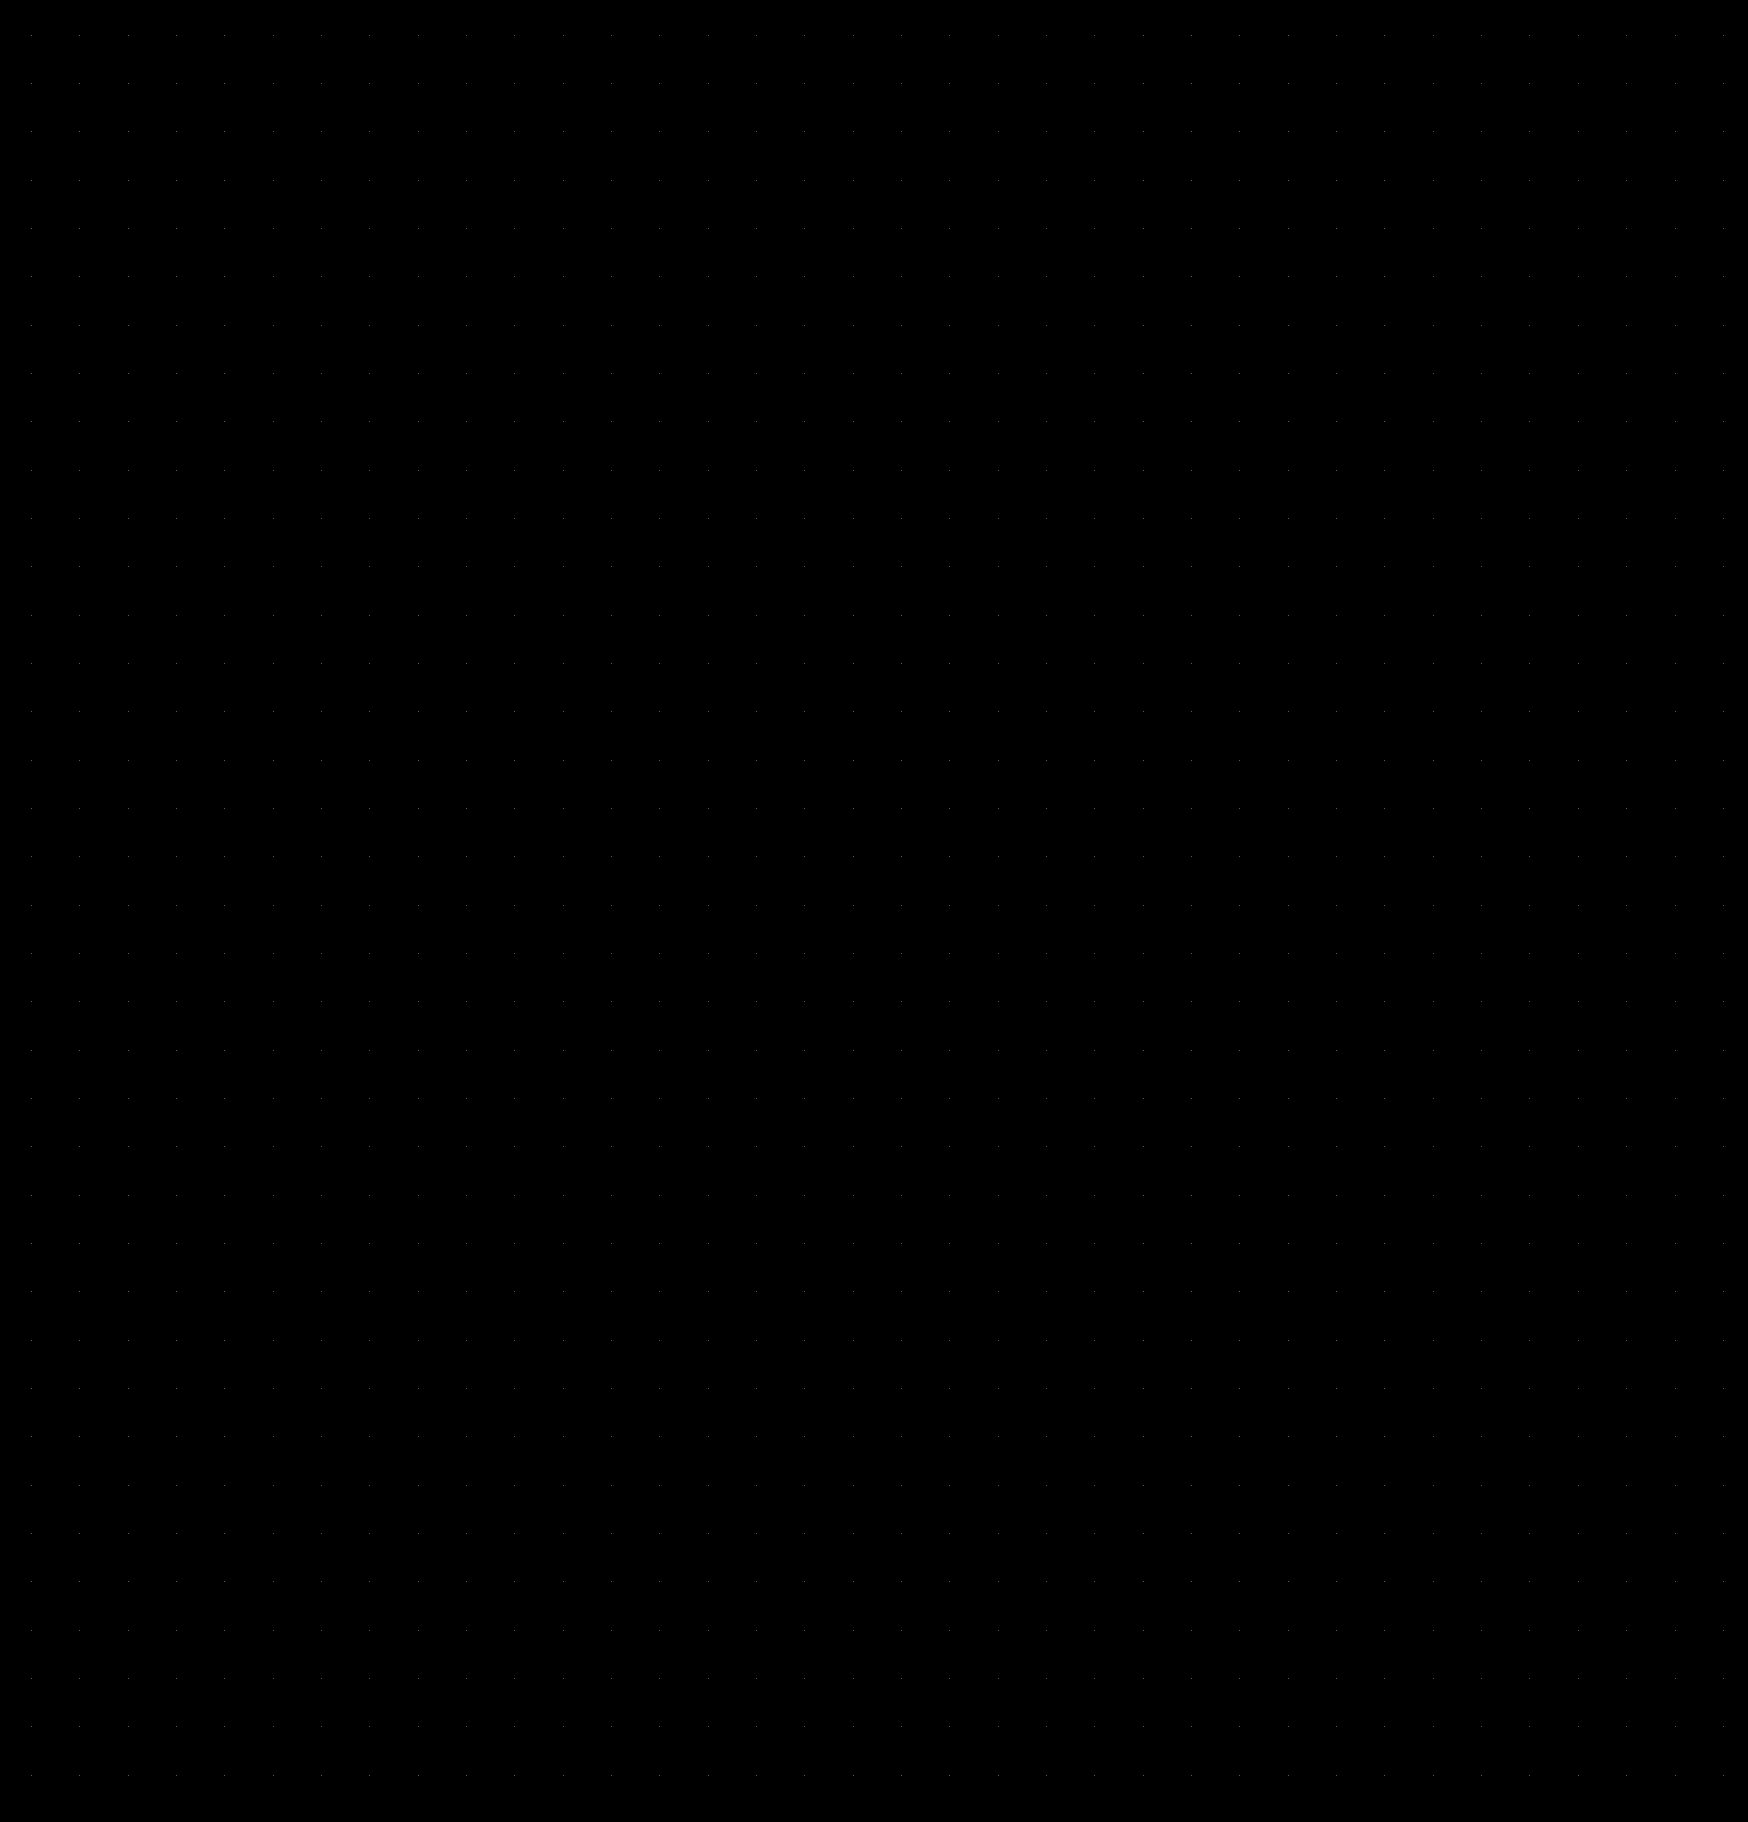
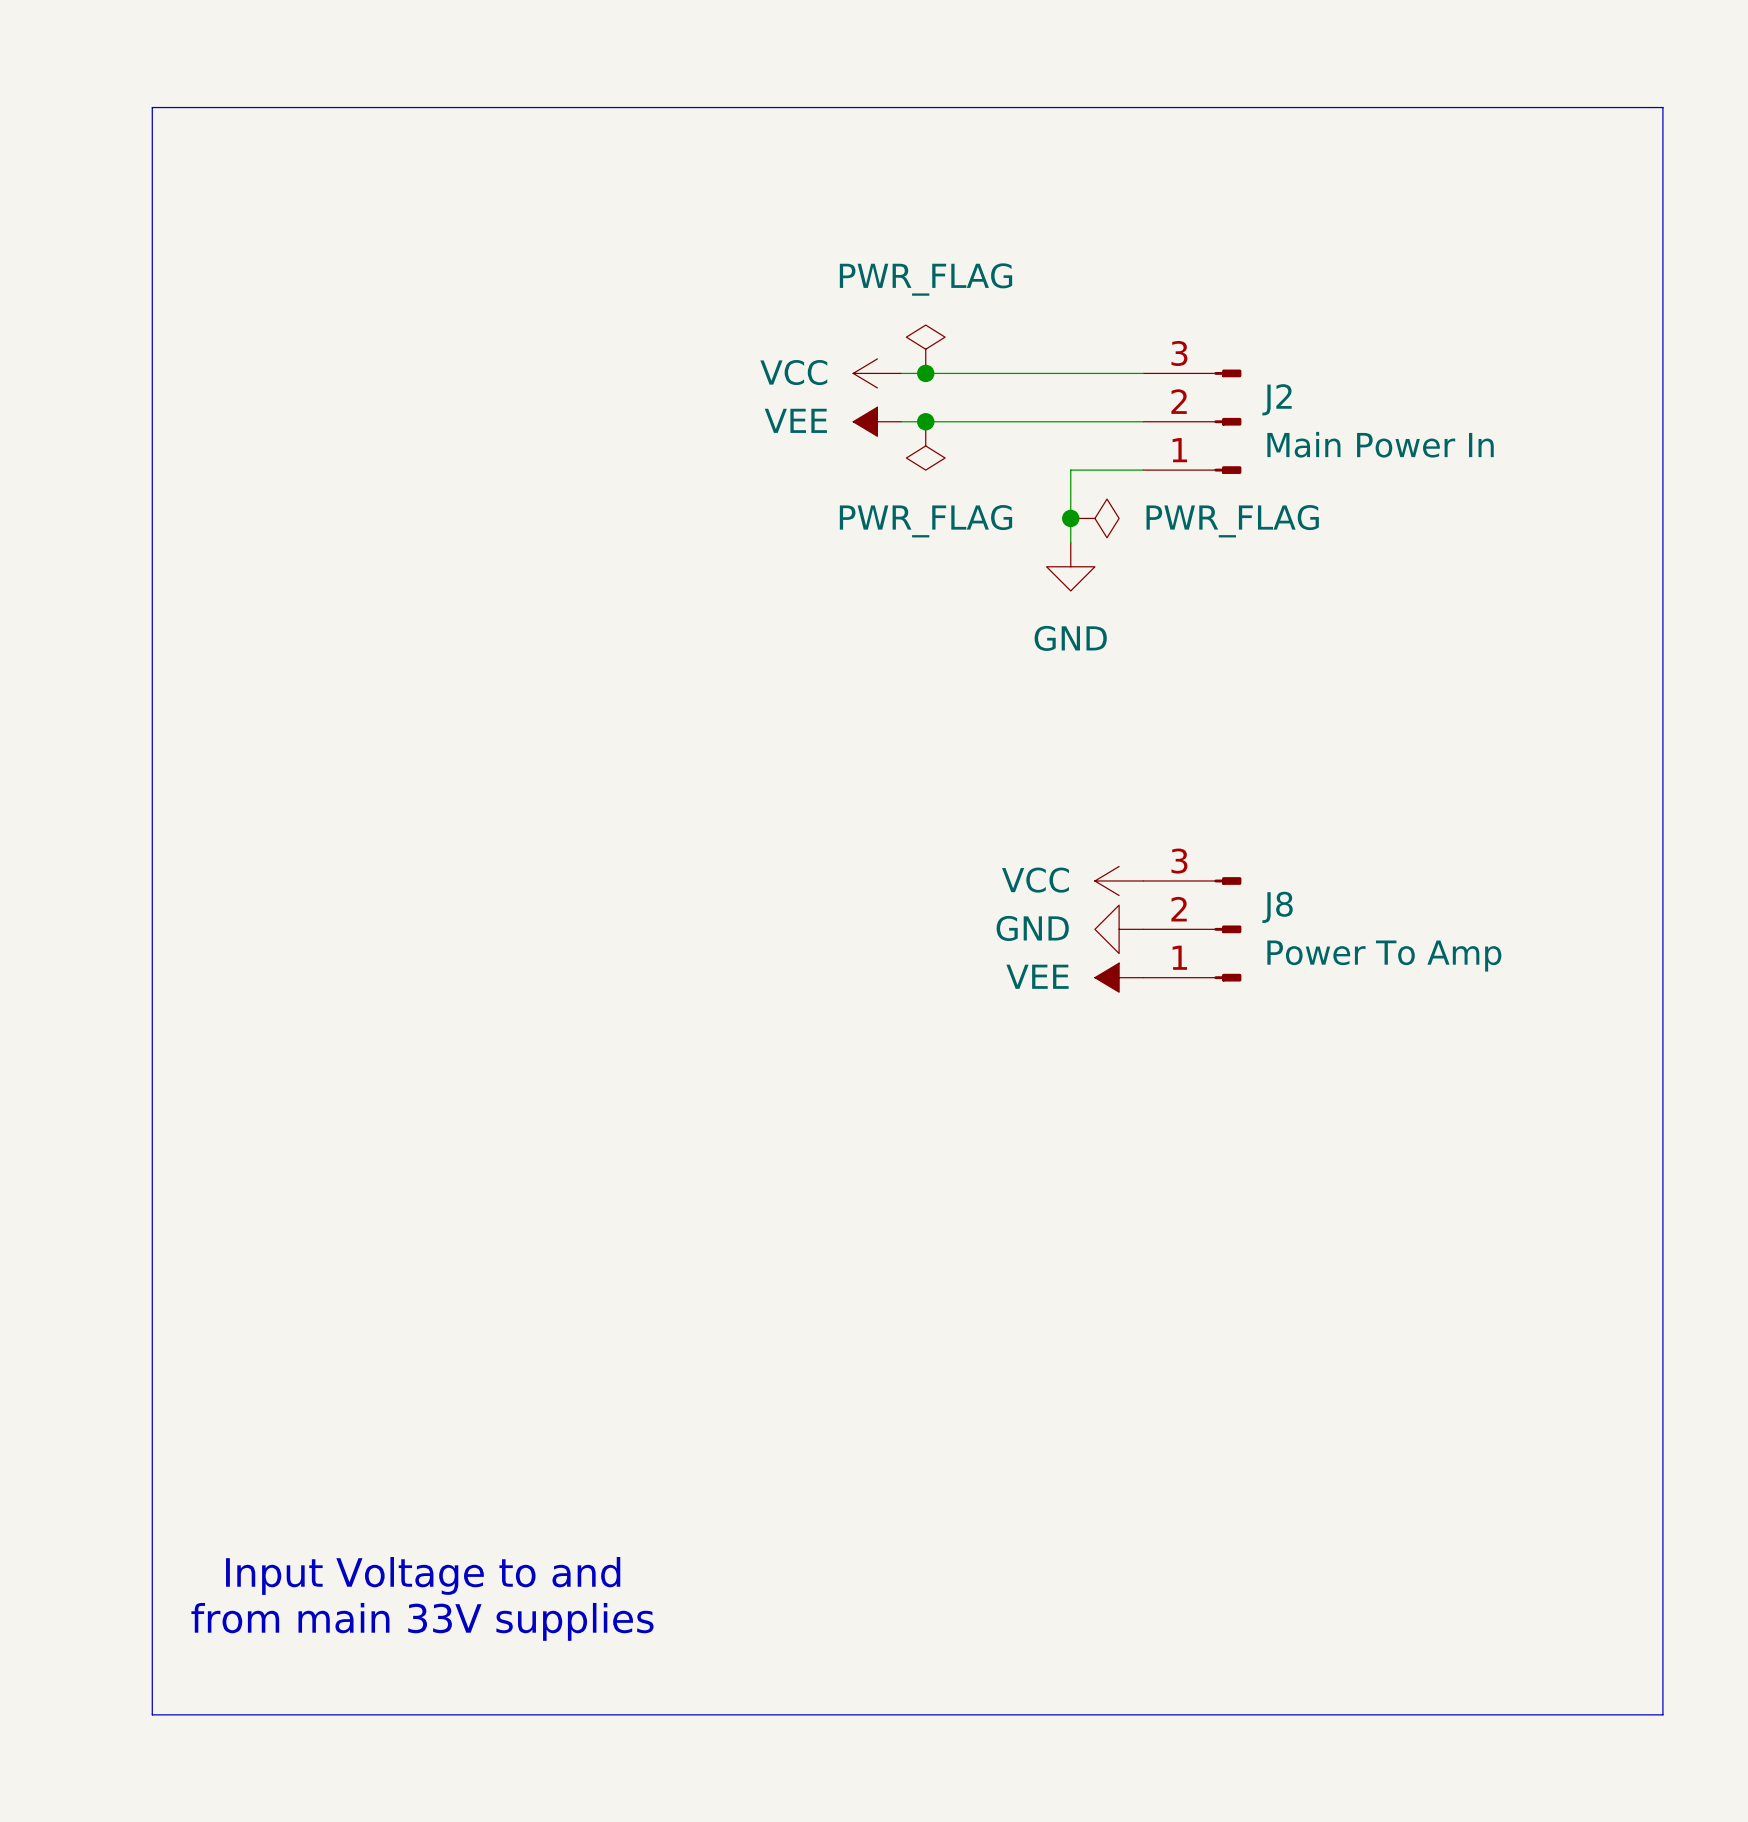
line: none -> (152, 107) (1662, 107) (1662, 1714) (152, 1714) (152, 107)
power symbol: none -> PWR_FLAG (925, 349)
power symbol: none -> VCC (877, 373)
wire: none -> (901, 373) (1143, 373)
junction: none -> (925, 373)
power symbol: none -> VEE (877, 421)
wire: none -> (901, 421) (1143, 421)
junction: none -> (925, 421)
J2: none -> Main Power In (1192, 421)
power symbol: none -> PWR_FLAG (925, 445)
wire: none -> (1143, 470) (1070, 470) (1070, 542)
junction: none -> (1070, 518)
power symbol: none -> PWR_FLAG (1094, 518)
power symbol: none -> GND (1070, 566)
power symbol: none -> VCC (1119, 880)
power symbol: none -> GND (1119, 929)
J8: none -> Power To Amp (1192, 929)
power symbol: none -> VEE (1119, 977)
text: none -> Input Voltage to and (423, 1575)
text: none -> from main 33V supplies (422, 1621)

